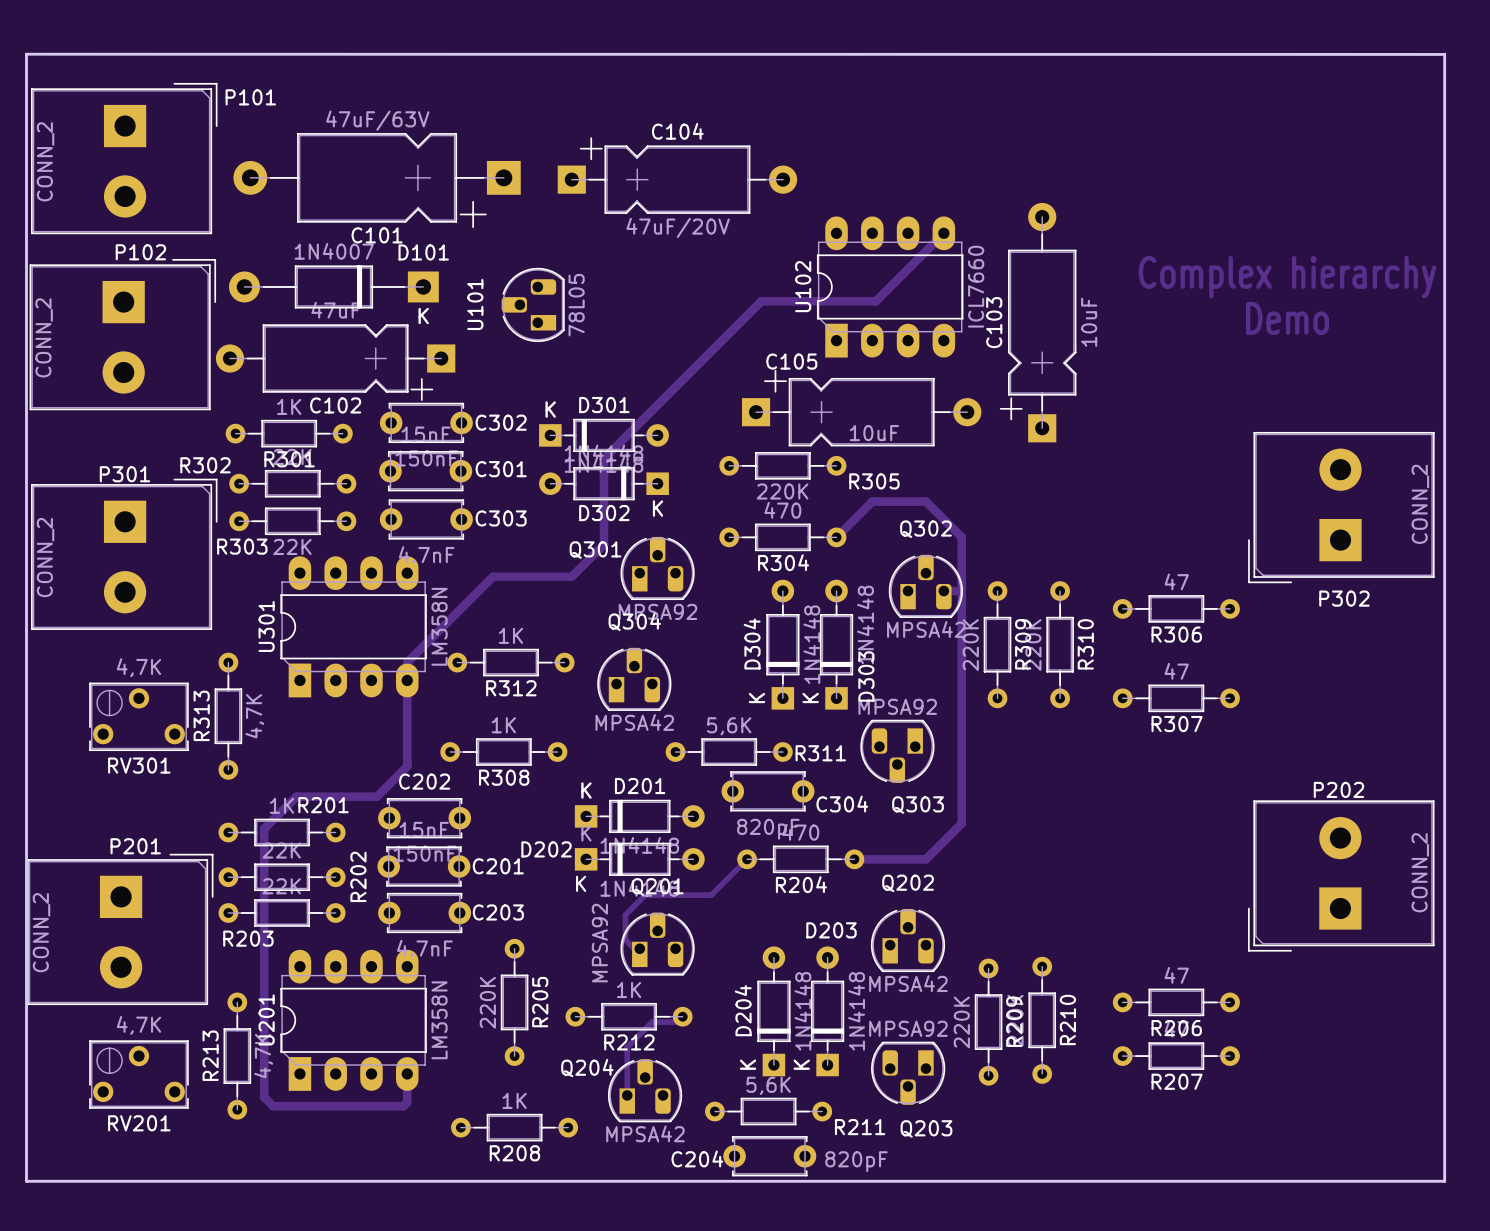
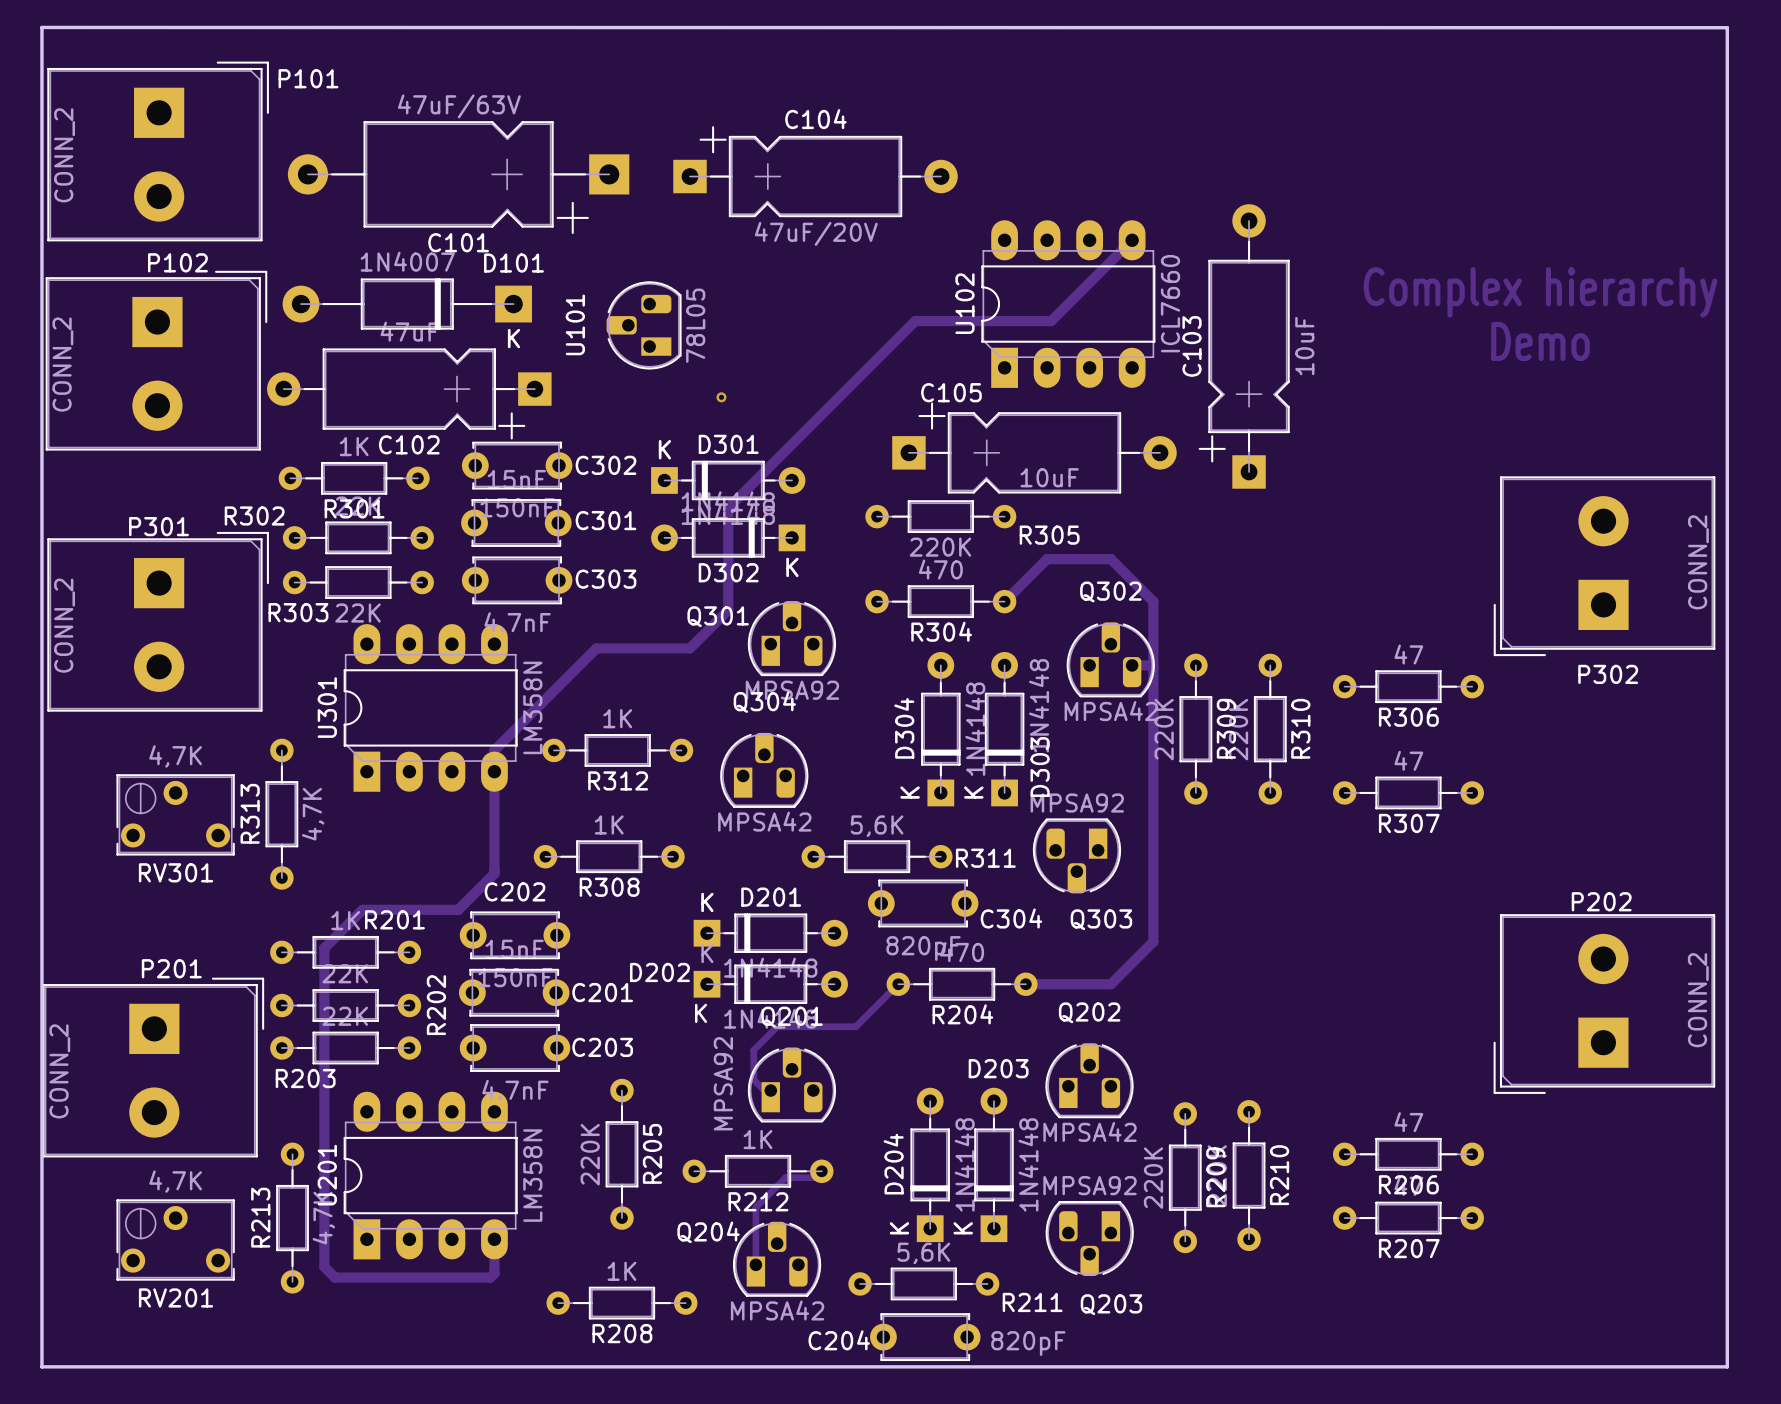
via: none -> (721, 397)

